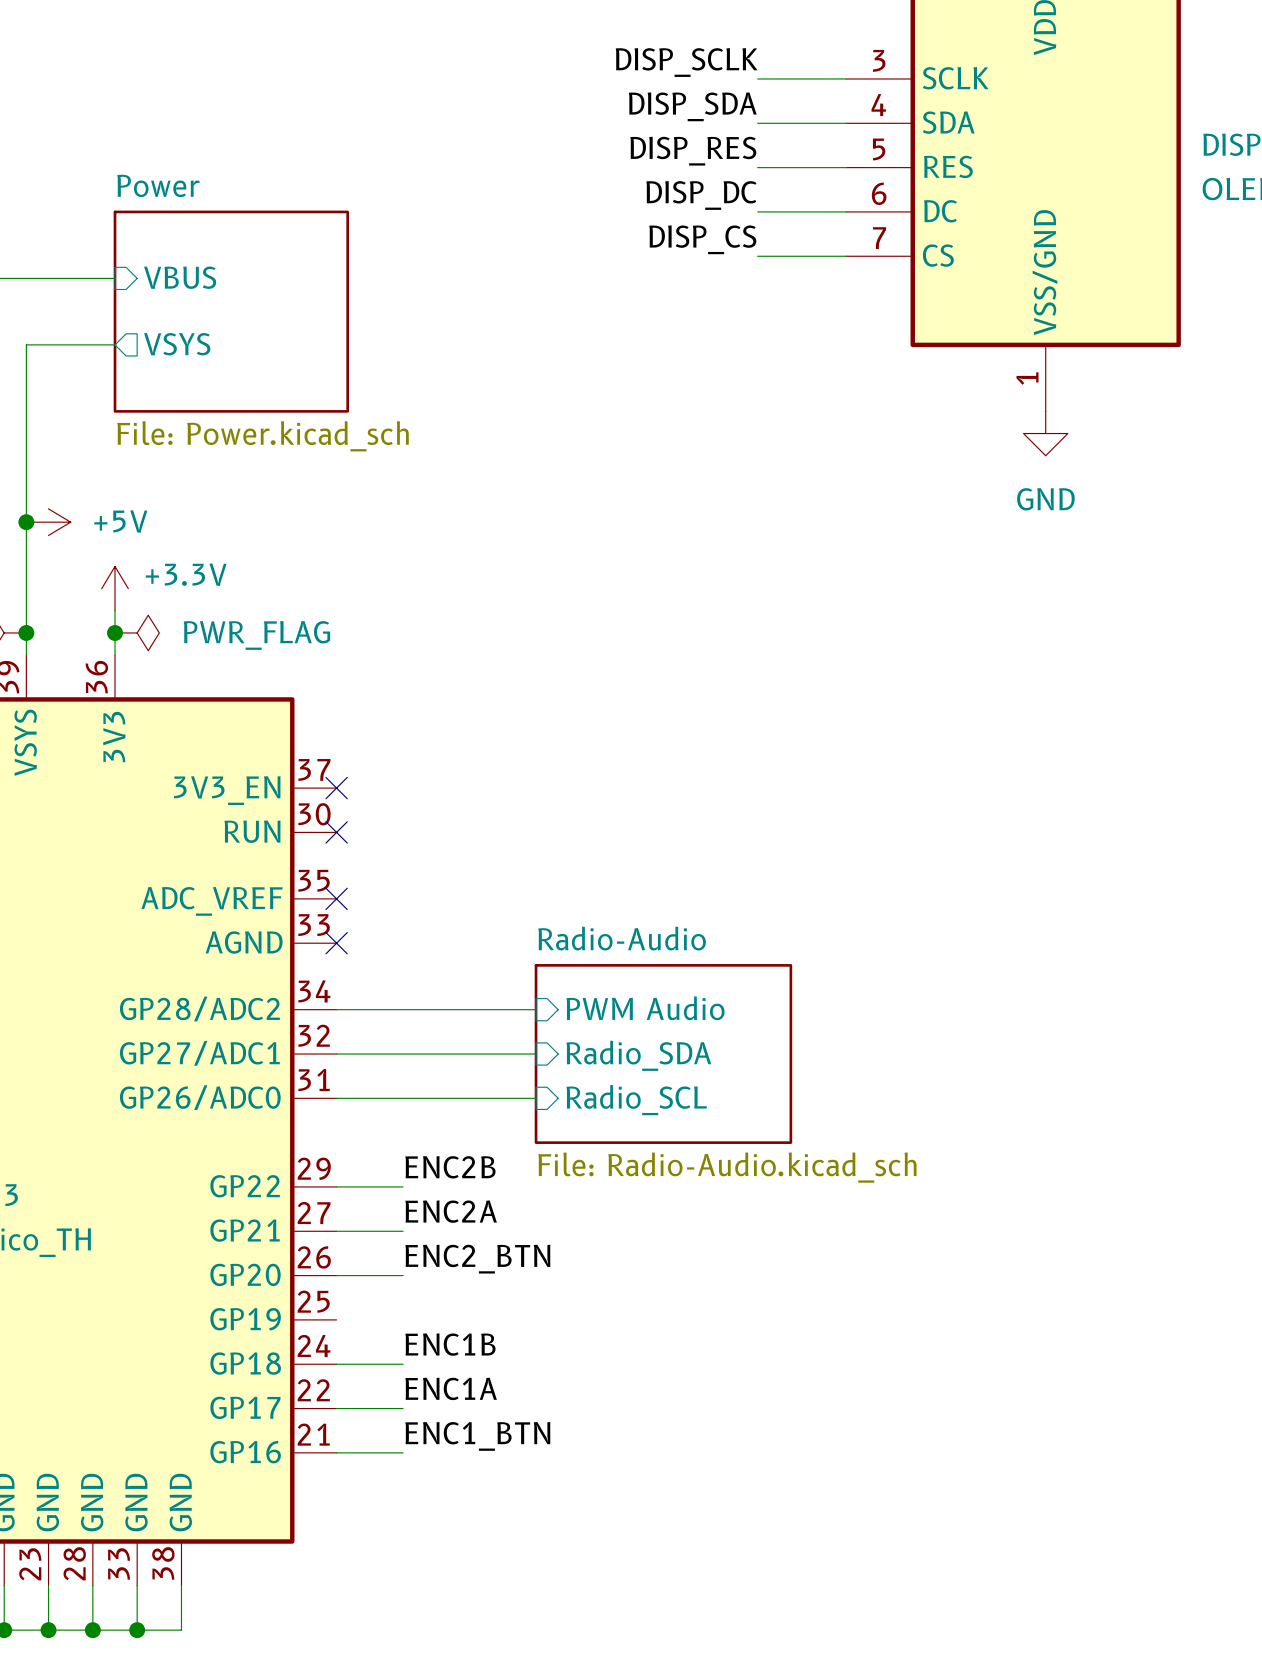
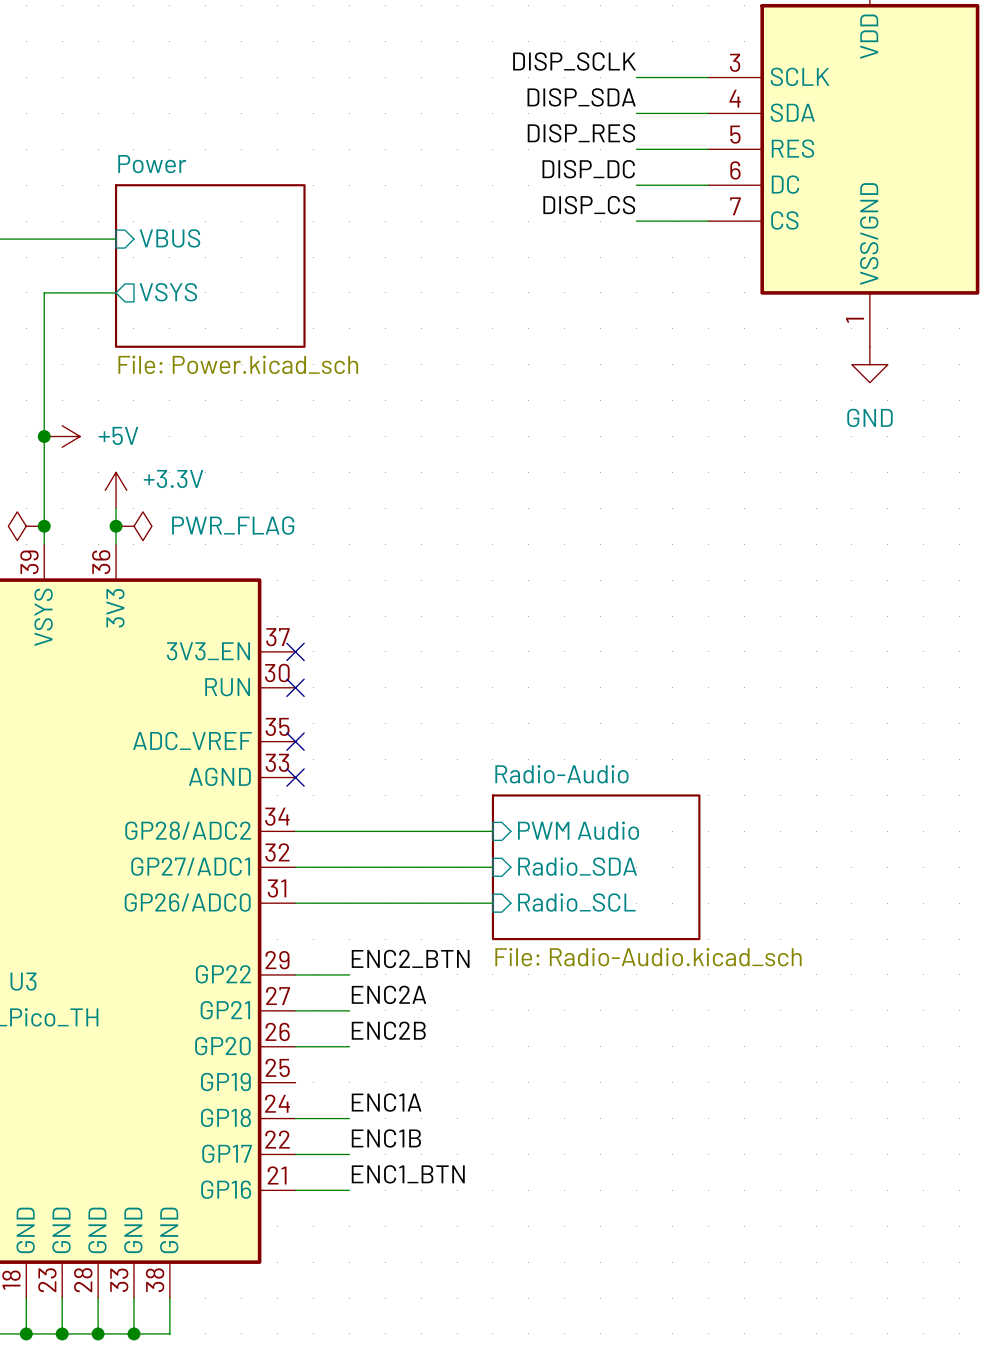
sheet pin position: PWM Audio (645, 1008) -> PWM Audio (578, 830)
wire: none -> (457, 831) (492, 831)
wire: none -> (457, 867) (492, 867)
sheet Radio-Audio position: (663, 1054) -> (596, 867)
sheet pin position: Radio_SDA (638, 1055) -> Radio_SDA (577, 866)
wire: none -> (457, 903) (492, 903)
sheet pin position: Radio_SCL (636, 1100) -> Radio_SCL (576, 902)
label: ENC2B (450, 1167) -> ENC2_BTN (410, 958)
label: ENC2_BTN (477, 1259) -> ENC2B (388, 1030)
label: ENC1B (450, 1344) -> ENC1A (386, 1102)
label: ENC1A (451, 1388) -> ENC1B (386, 1138)

